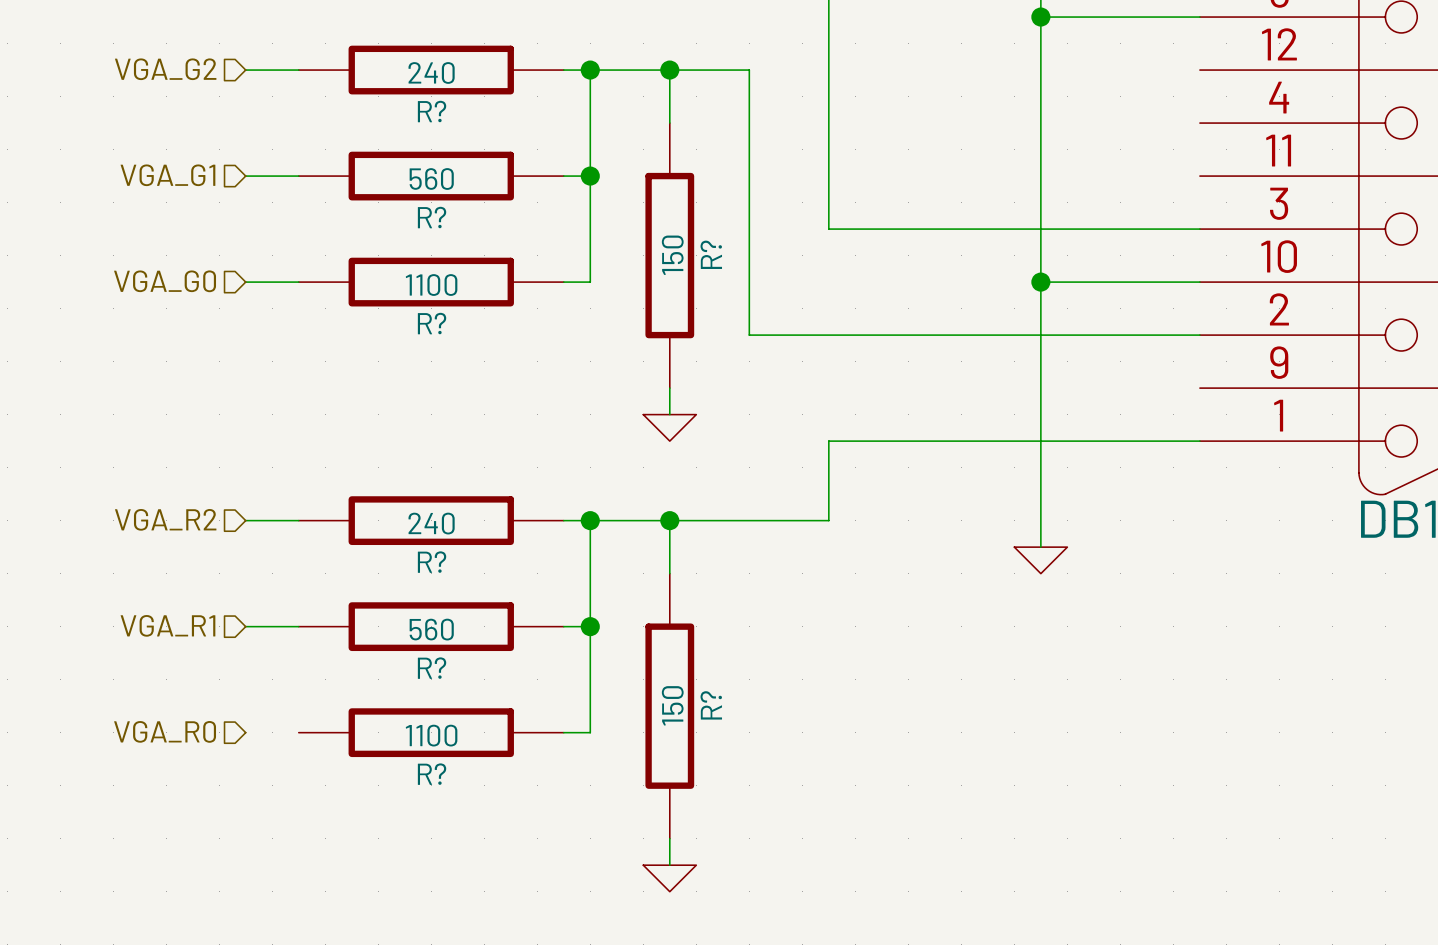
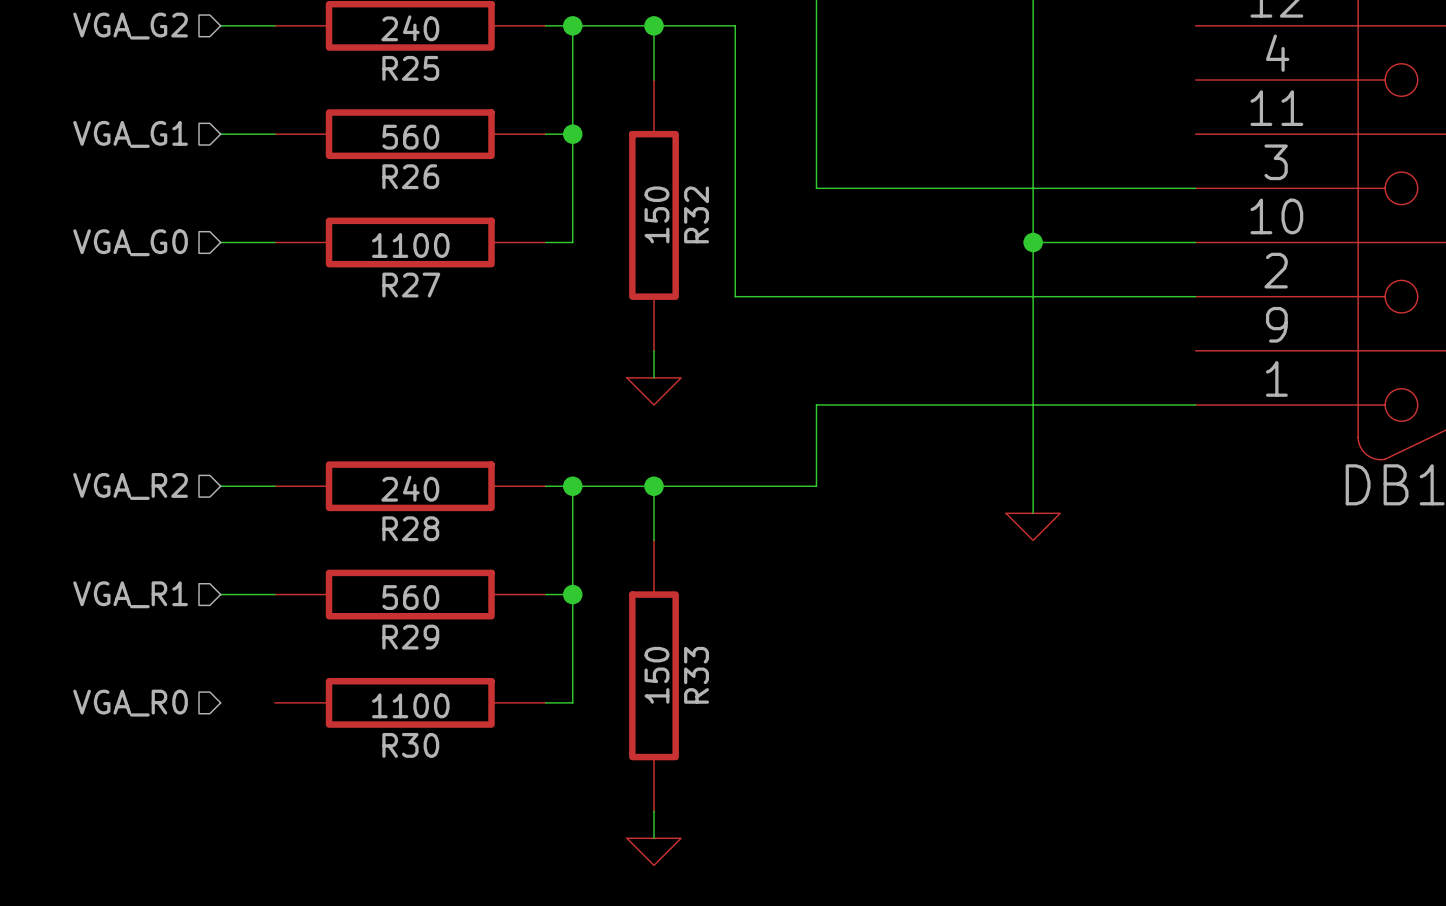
R? name: R? (432, 111) -> R25 (410, 68)
R? name: R? (432, 217) -> R26 (410, 176)
R? name: R? (711, 254) -> R32 (696, 214)
R? name: R? (432, 323) -> R27 (411, 285)
R? name: R? (432, 562) -> R28 (410, 528)
R? name: R? (432, 668) -> R29 (410, 637)
R? name: R? (711, 705) -> R33 (696, 675)
R? name: R? (432, 774) -> R30 (410, 745)

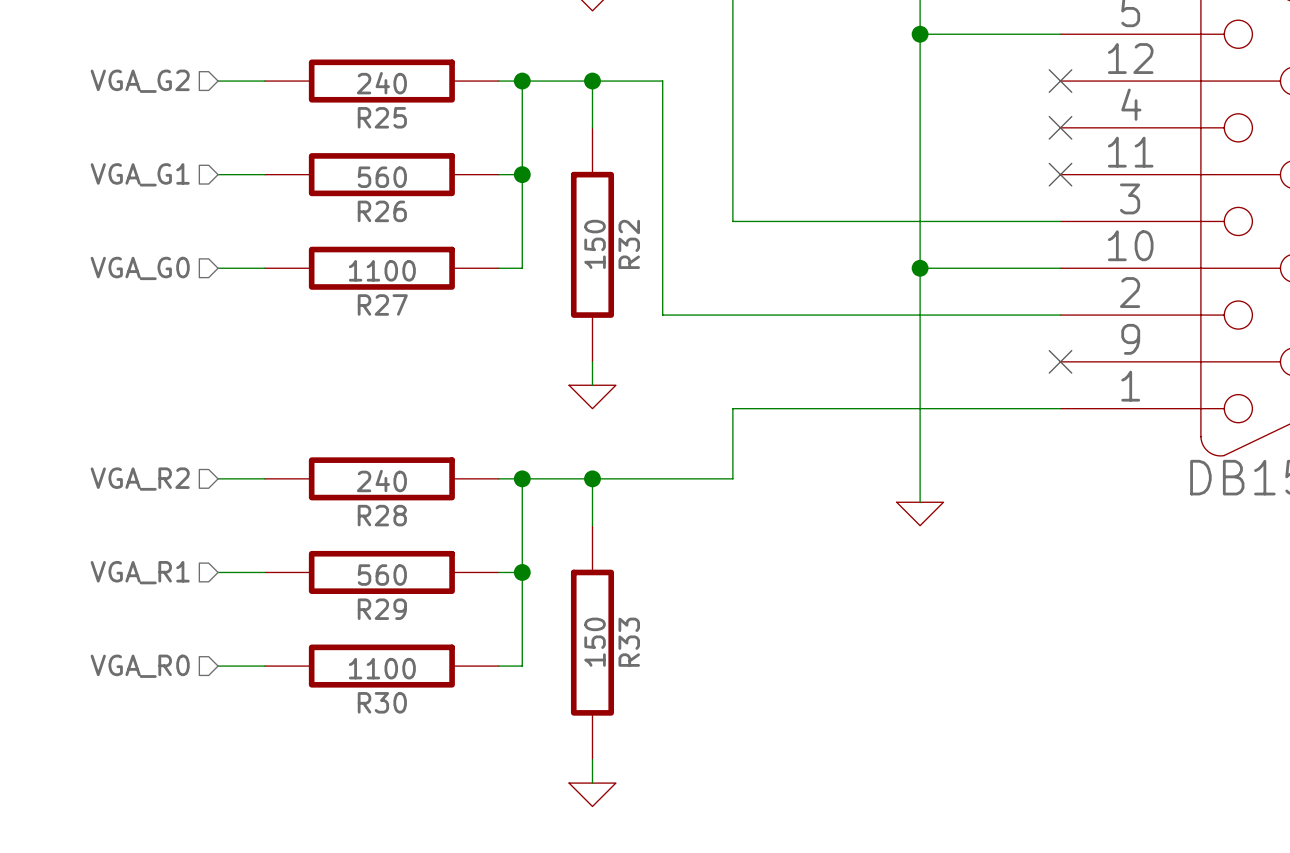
no-connect mark: none -> (1060, 81)
no-connect mark: none -> (1060, 127)
no-connect mark: none -> (1060, 174)
no-connect mark: none -> (1060, 361)
wire: none -> (218, 666) (264, 666)

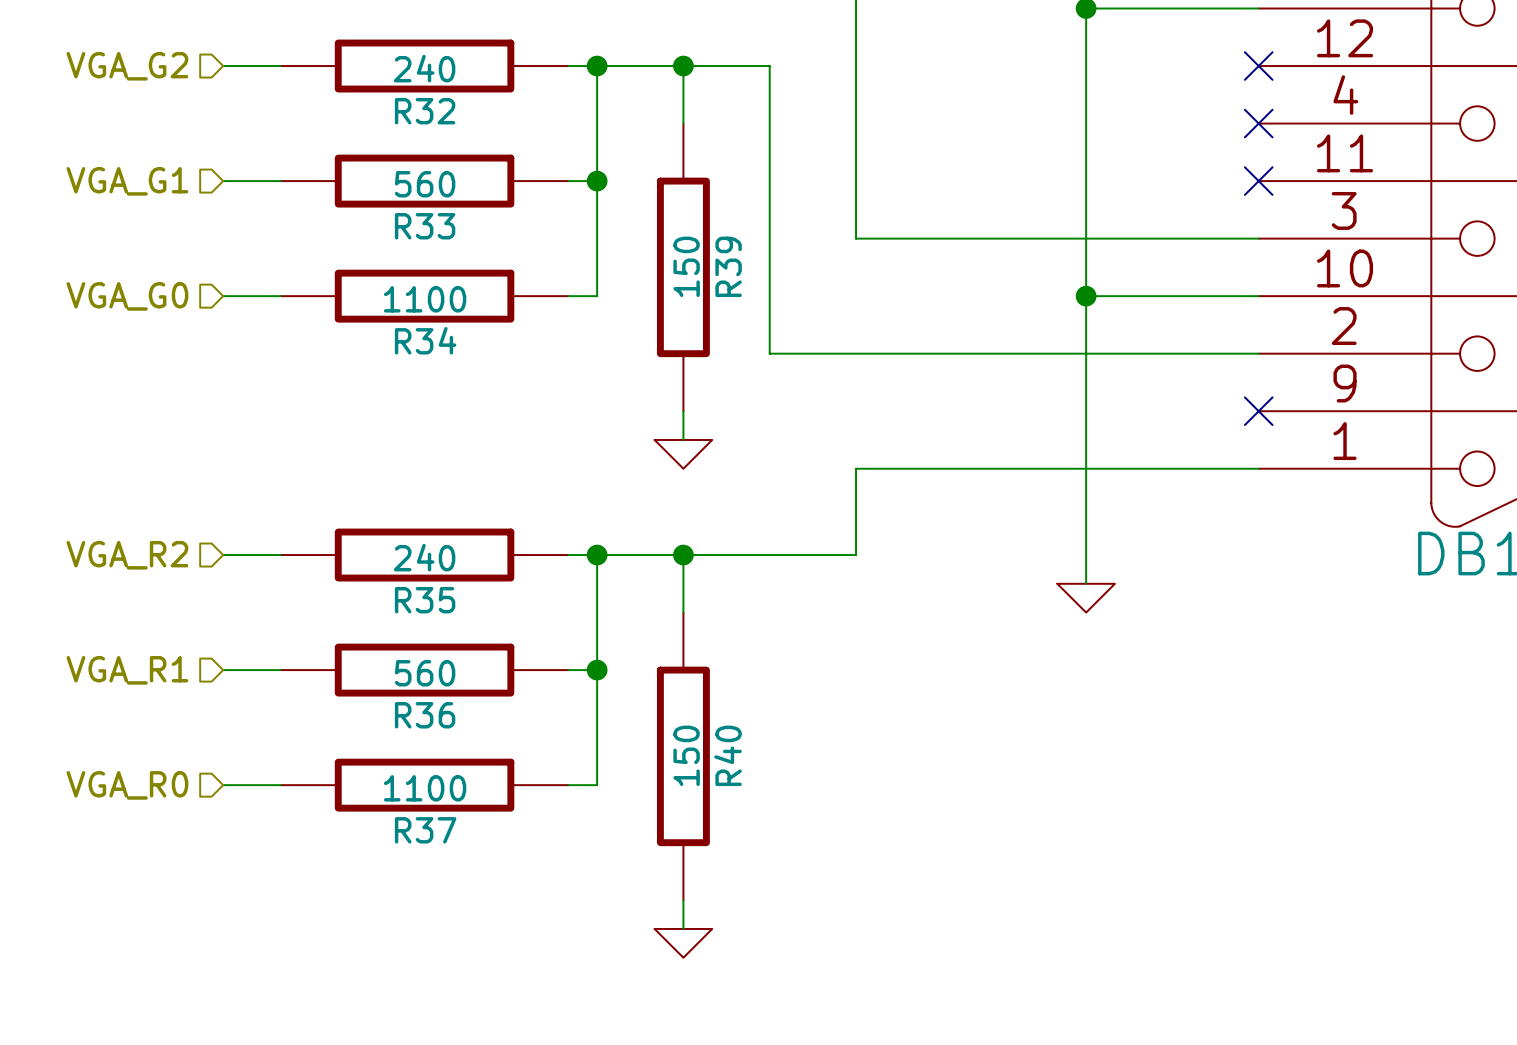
R25 name: R25 (382, 117) -> R32 (425, 111)
R26 name: R26 (382, 211) -> R33 (425, 226)
R32 name: R32 (629, 244) -> R39 (728, 266)
R27 name: R27 (382, 304) -> R34 (425, 340)
R28 name: R28 (382, 515) -> R35 (425, 600)
R29 name: R29 (382, 609) -> R36 (425, 715)
R33 name: R33 (629, 642) -> R40 (728, 755)
R30 name: R30 (382, 702) -> R37 (425, 830)

